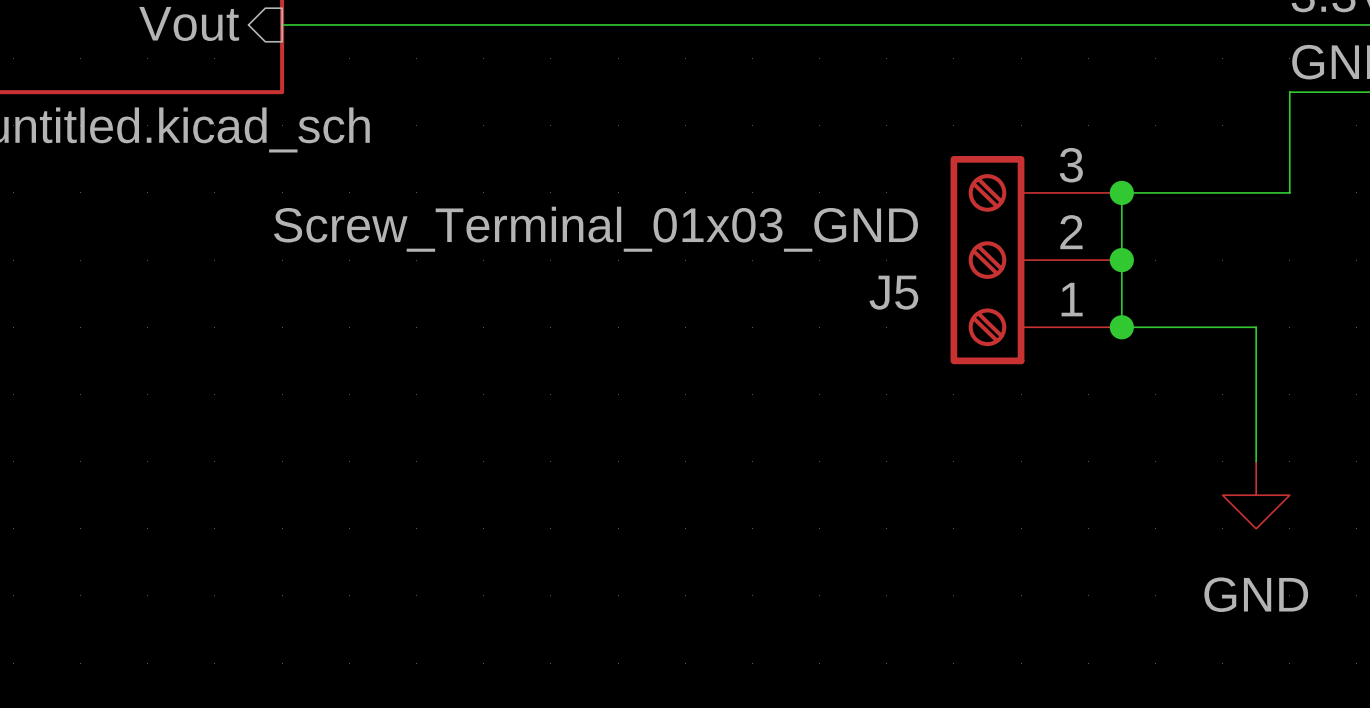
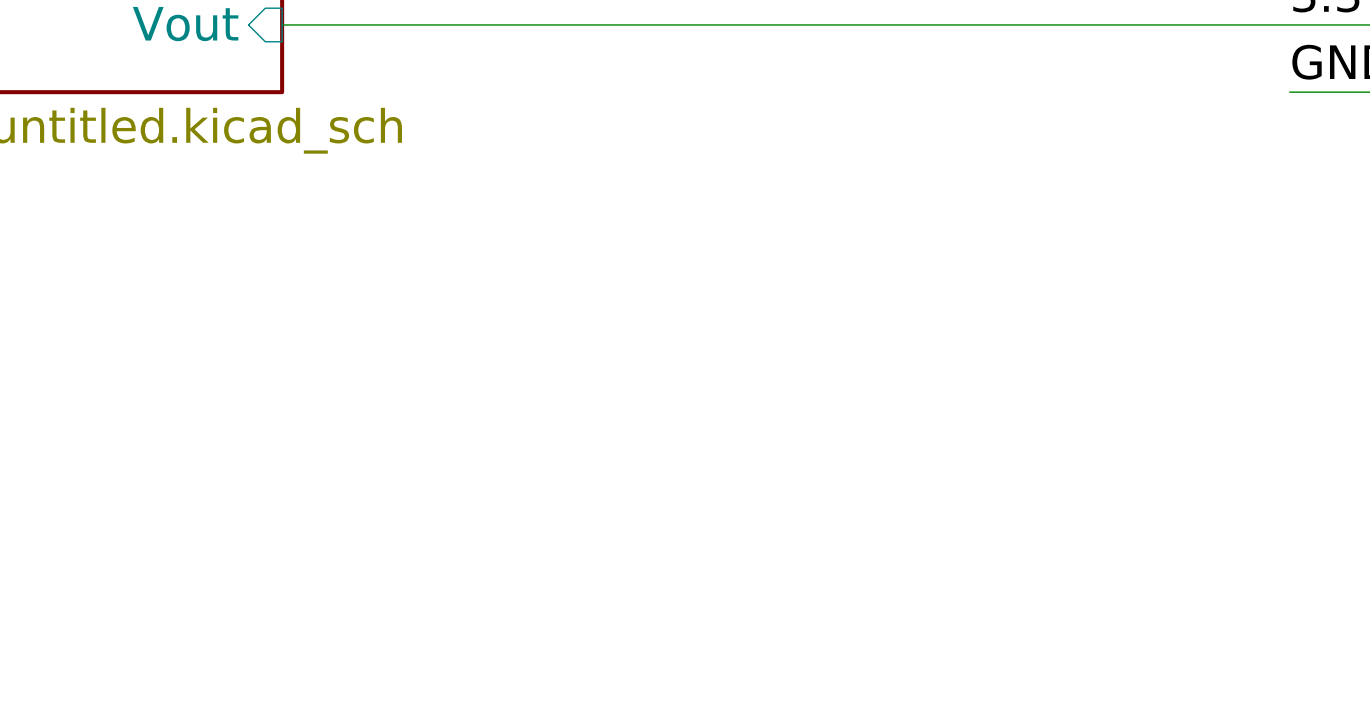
wire: (1289, 92) (1289, 192) (1121, 192) (1121, 327) (1256, 327) (1256, 461) -> none
junction: (1121, 192) -> none
J5: Screw_Terminal_01x03_GND (1036, 260) -> none
junction: (1121, 260) -> none
junction: (1121, 327) -> none
power symbol: GND (1256, 495) -> none

